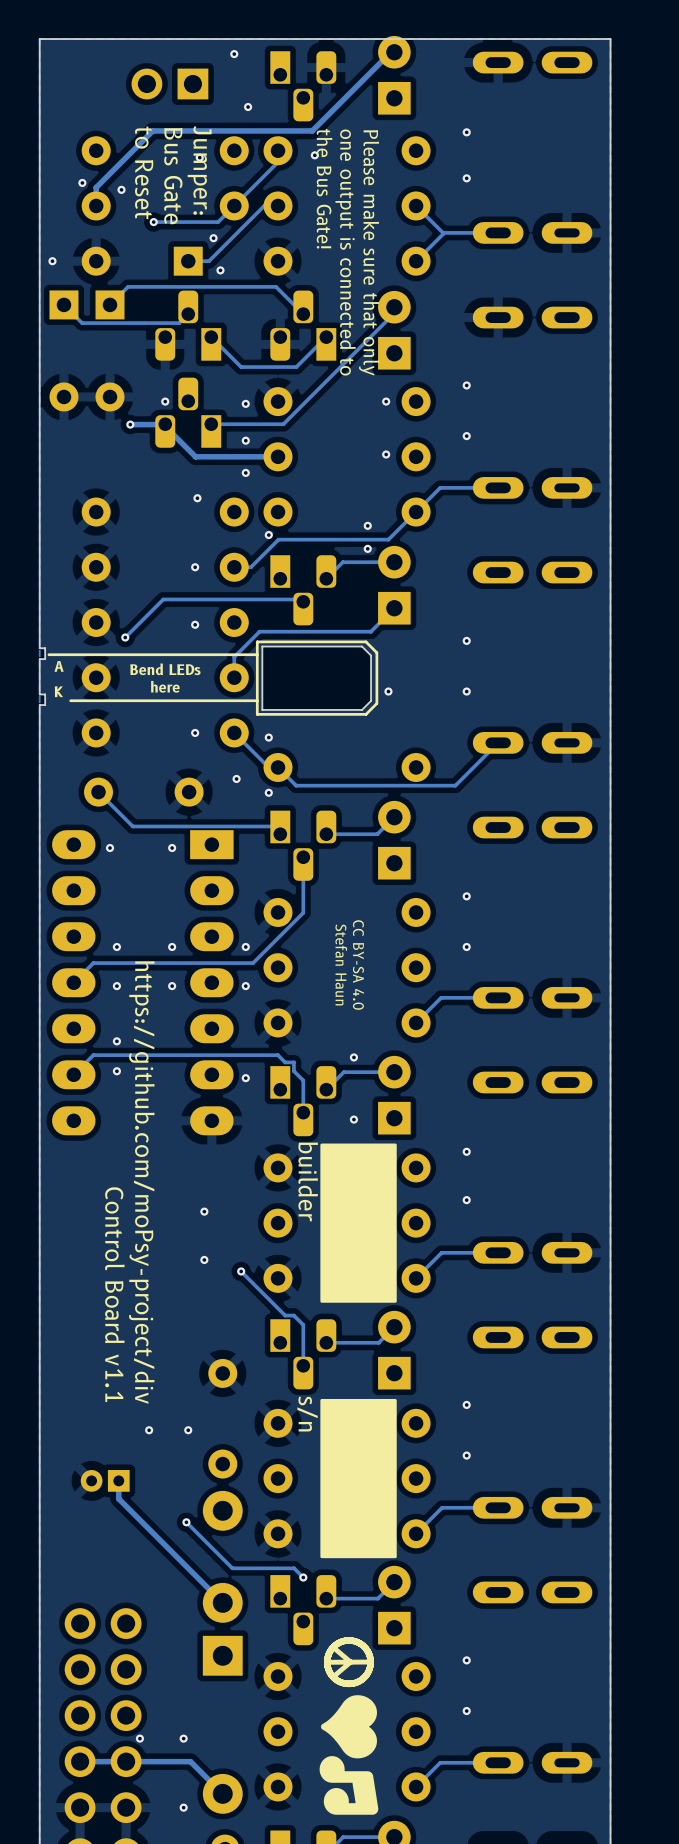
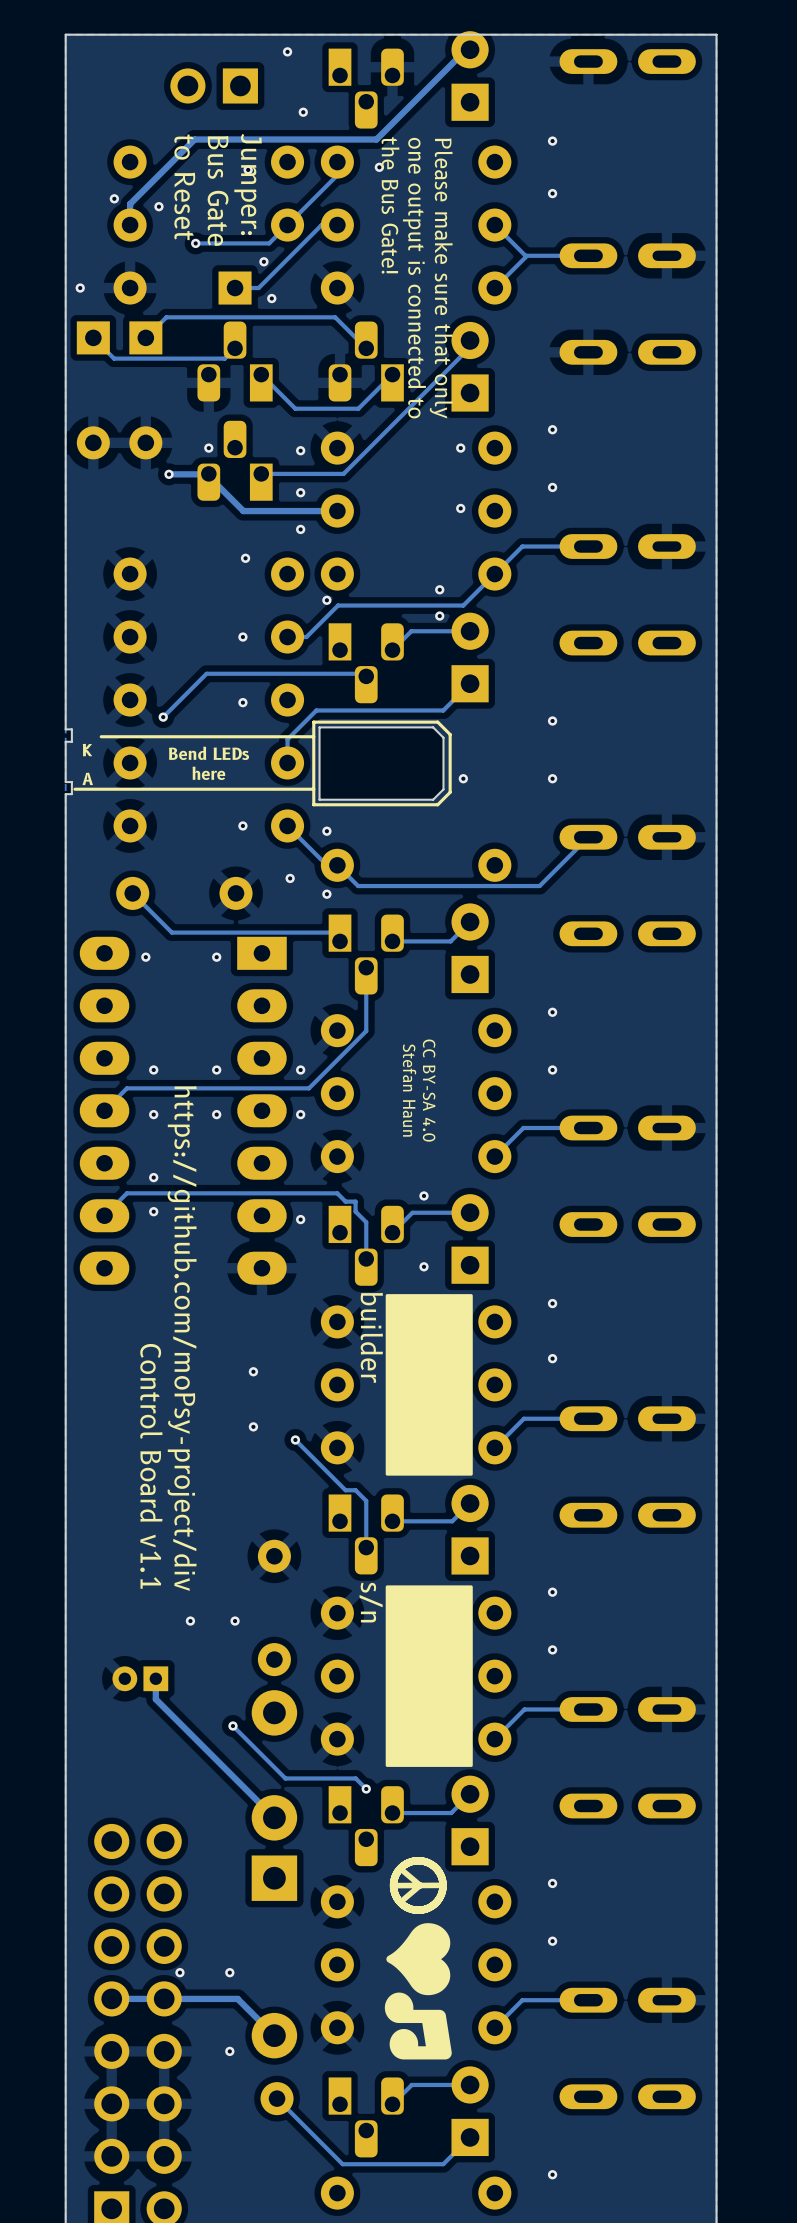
line: (70, 654) (48, 654) -> none
text: A (59, 666) -> K (87, 750)
text: K (58, 691) -> A (87, 778)
line: none -> (100, 789) (74, 789)

